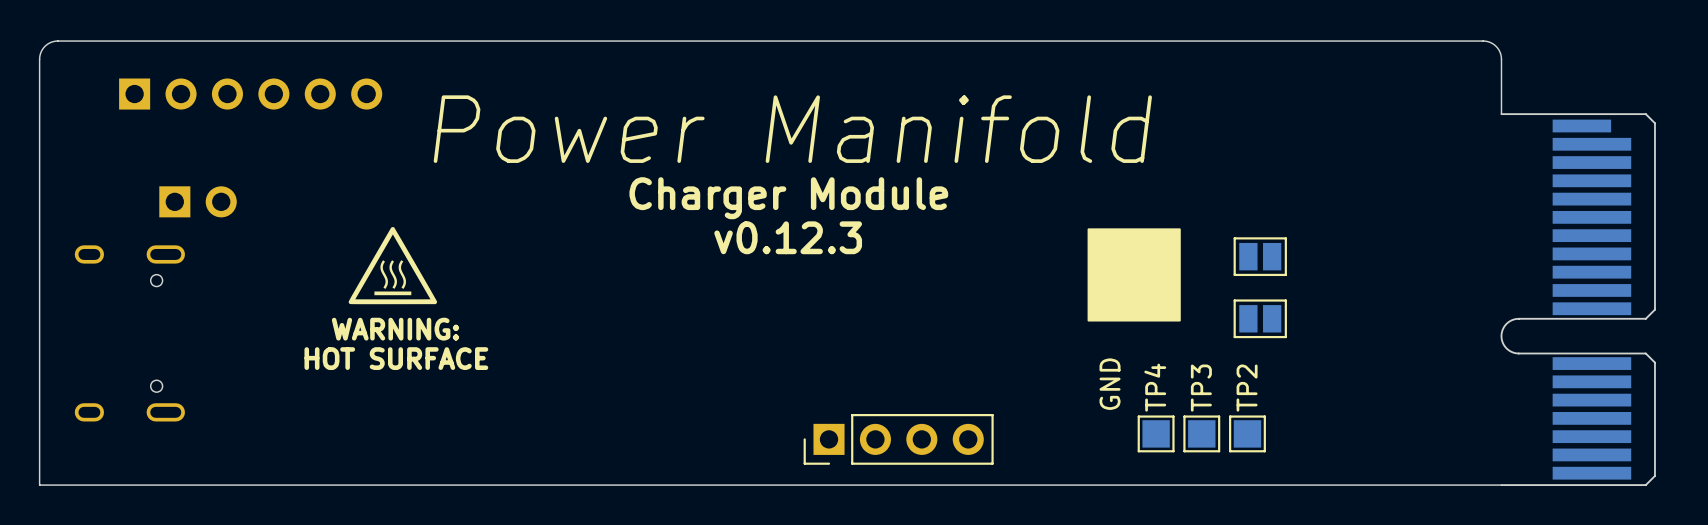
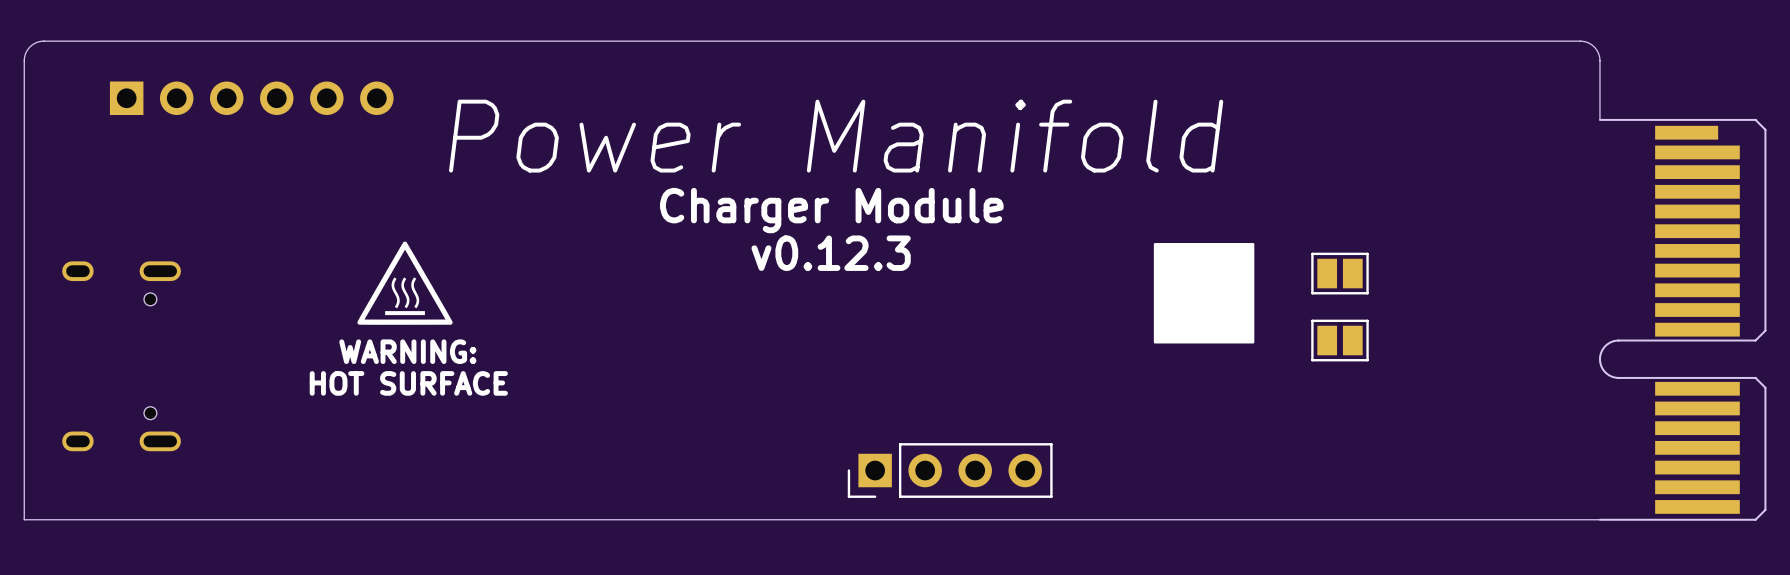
part: (198, 201) -> none
text: GND (1110, 384) -> none
text: TP4 (1155, 387) -> none
text: TP3 (1201, 388) -> none
text: TP2 (1247, 388) -> none
part: (1156, 433) -> none
part: (1201, 433) -> none
part: (1247, 433) -> none

